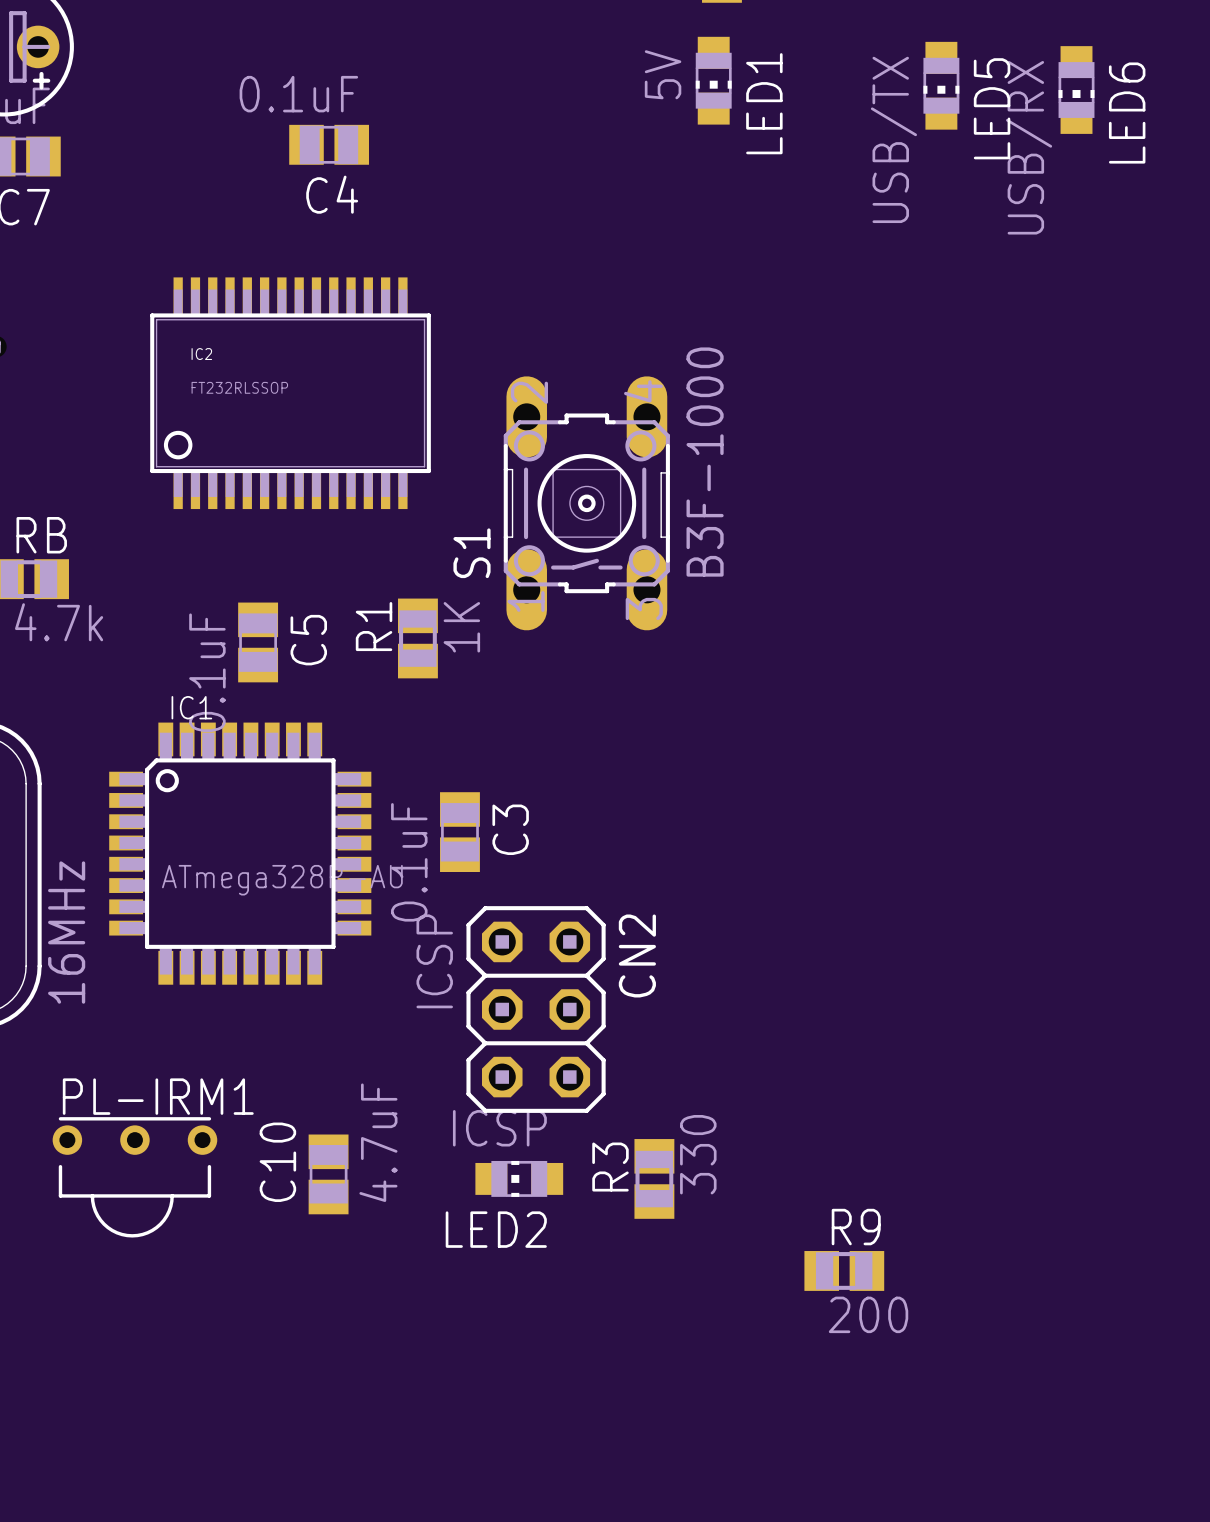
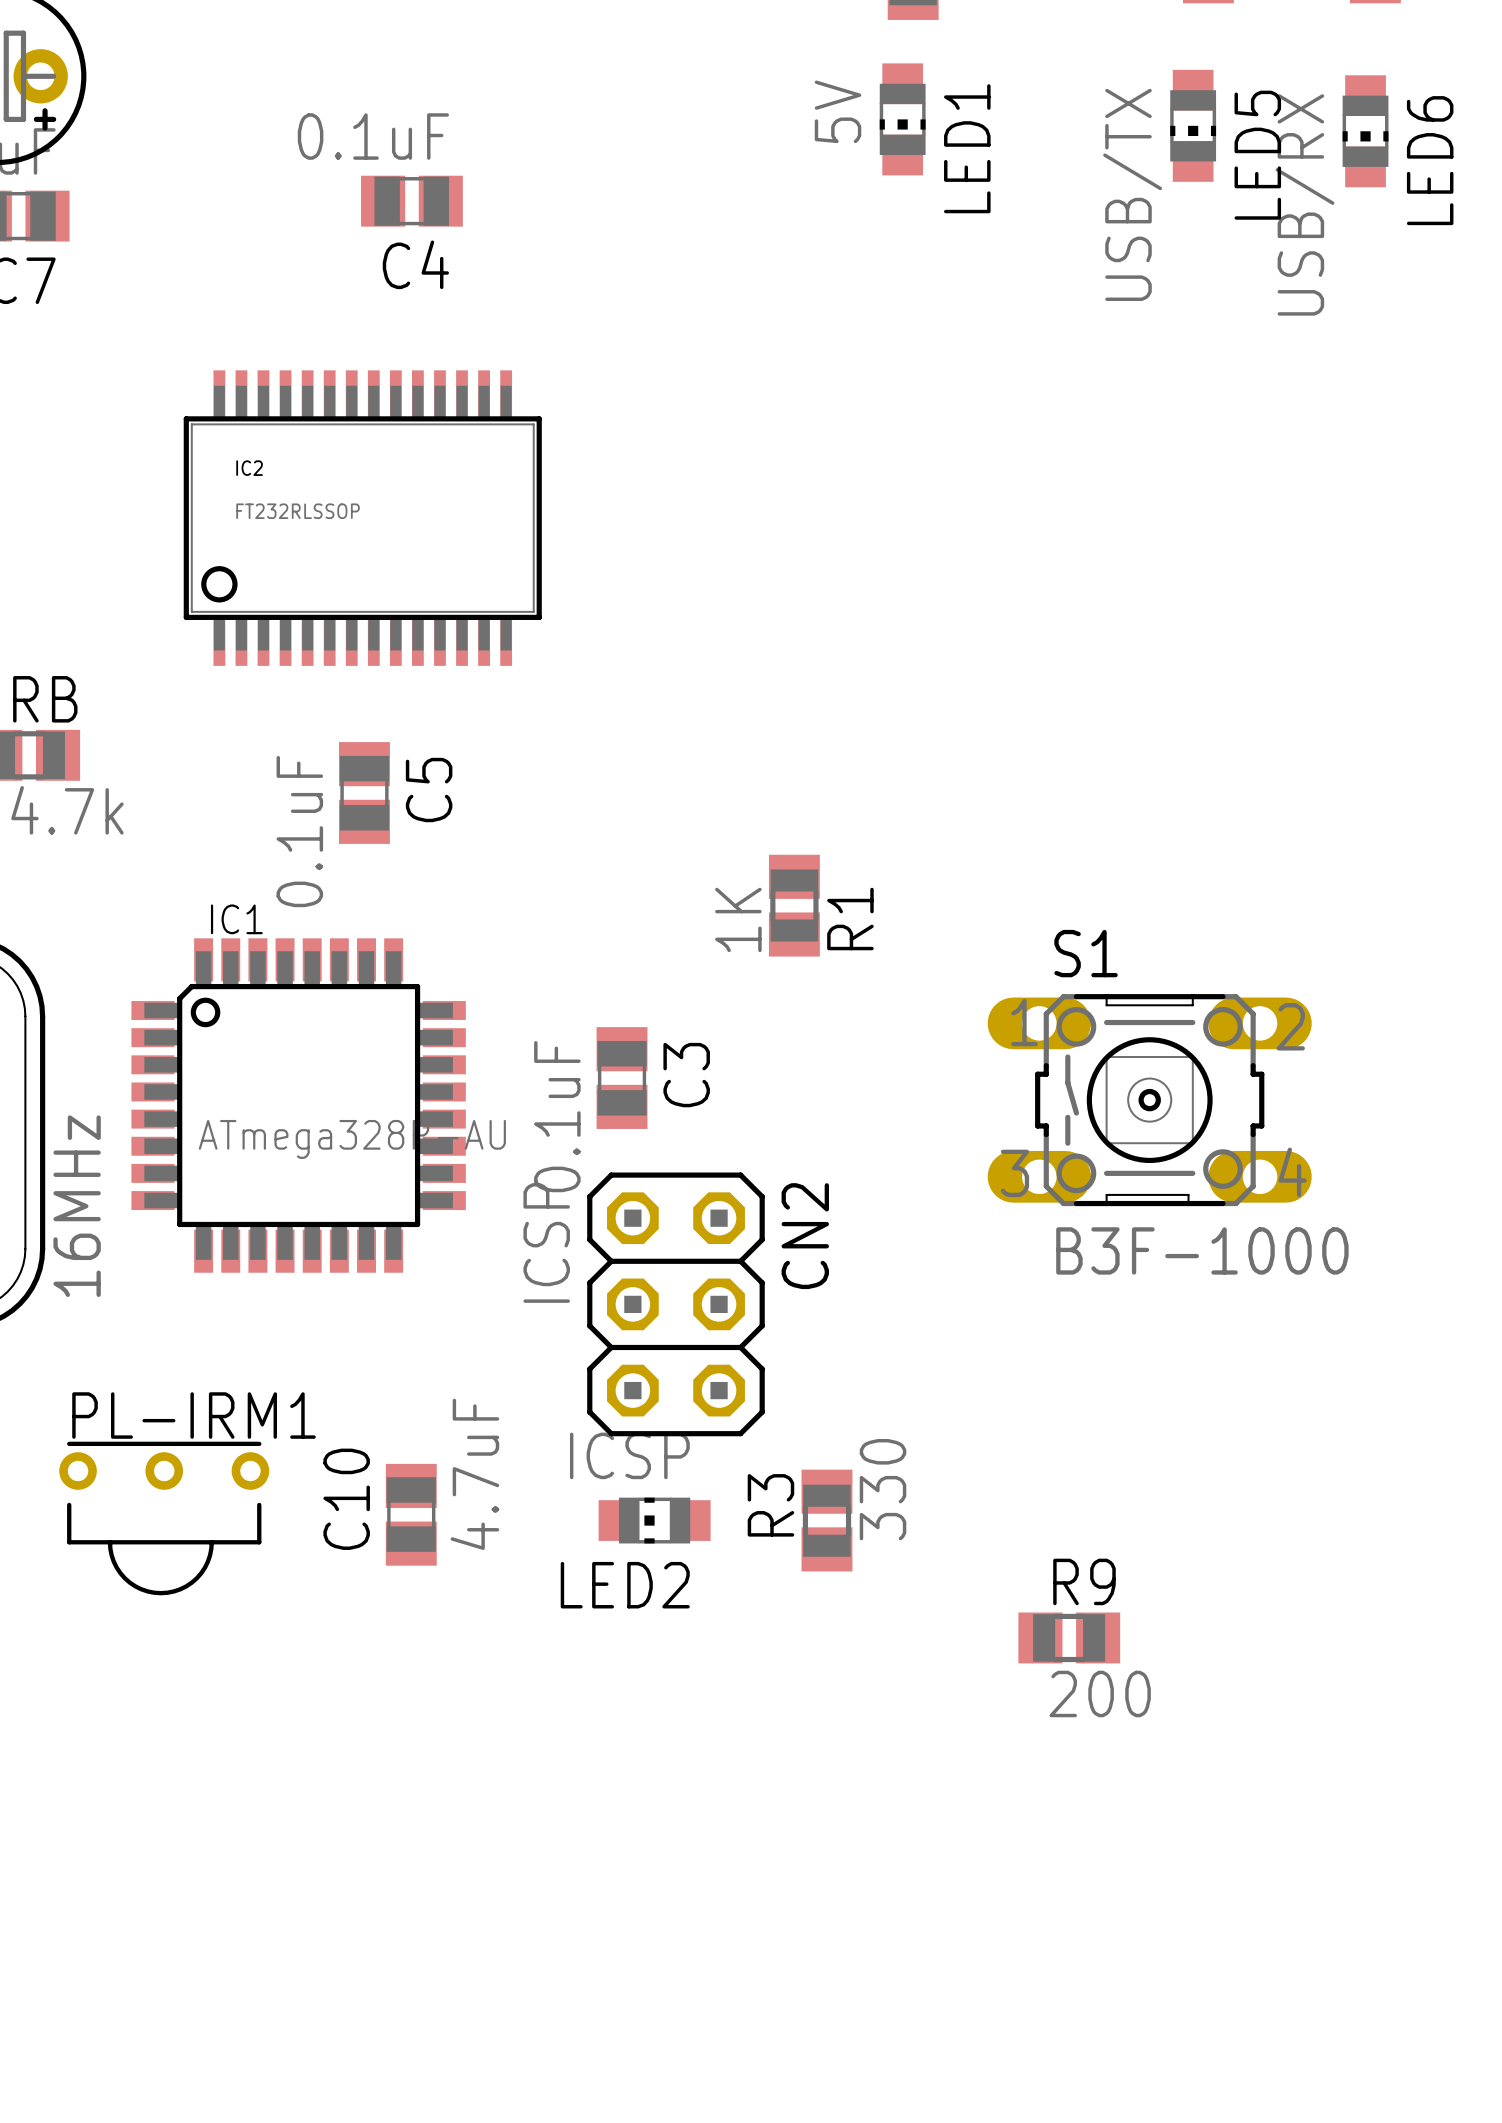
S1 rotation: 0° (586, 503) -> 90° clockwise (1149, 1100)
S1 position: (586, 503) -> (1149, 1100)
R1 name position: R1 (374, 626) -> R1 (850, 919)
R1 value position: 1K (461, 627) -> 1K (738, 919)
R1 position: (417, 638) -> (794, 905)
C5 position: (258, 642) -> (364, 792)
C3 position: (459, 832) -> (622, 1078)

